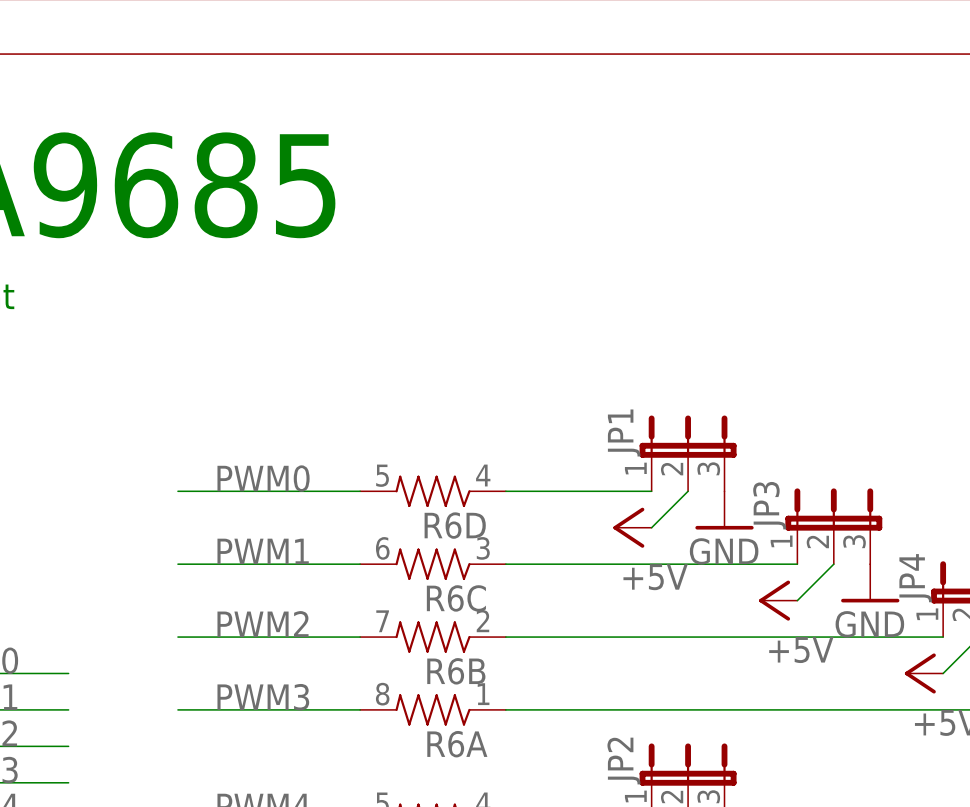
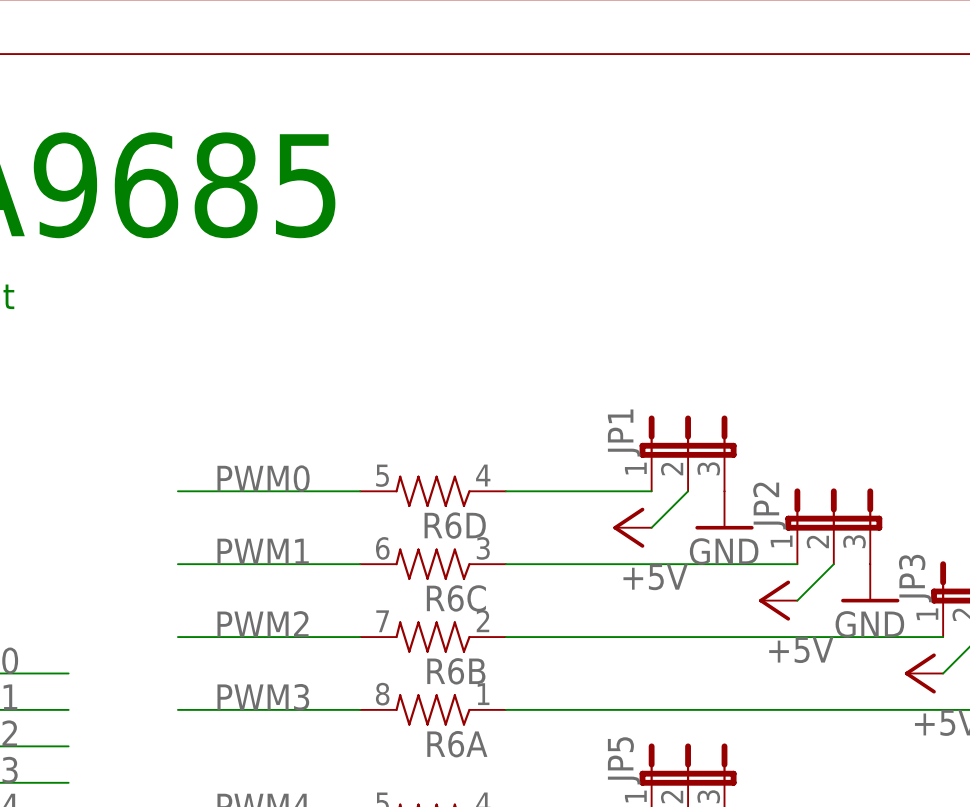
JP3 name: JP3 (769, 505) -> JP2 (769, 505)
JP4 name: JP4 (915, 578) -> JP3 (915, 578)
JP2 name: JP2 (623, 761) -> JP5 (624, 760)

